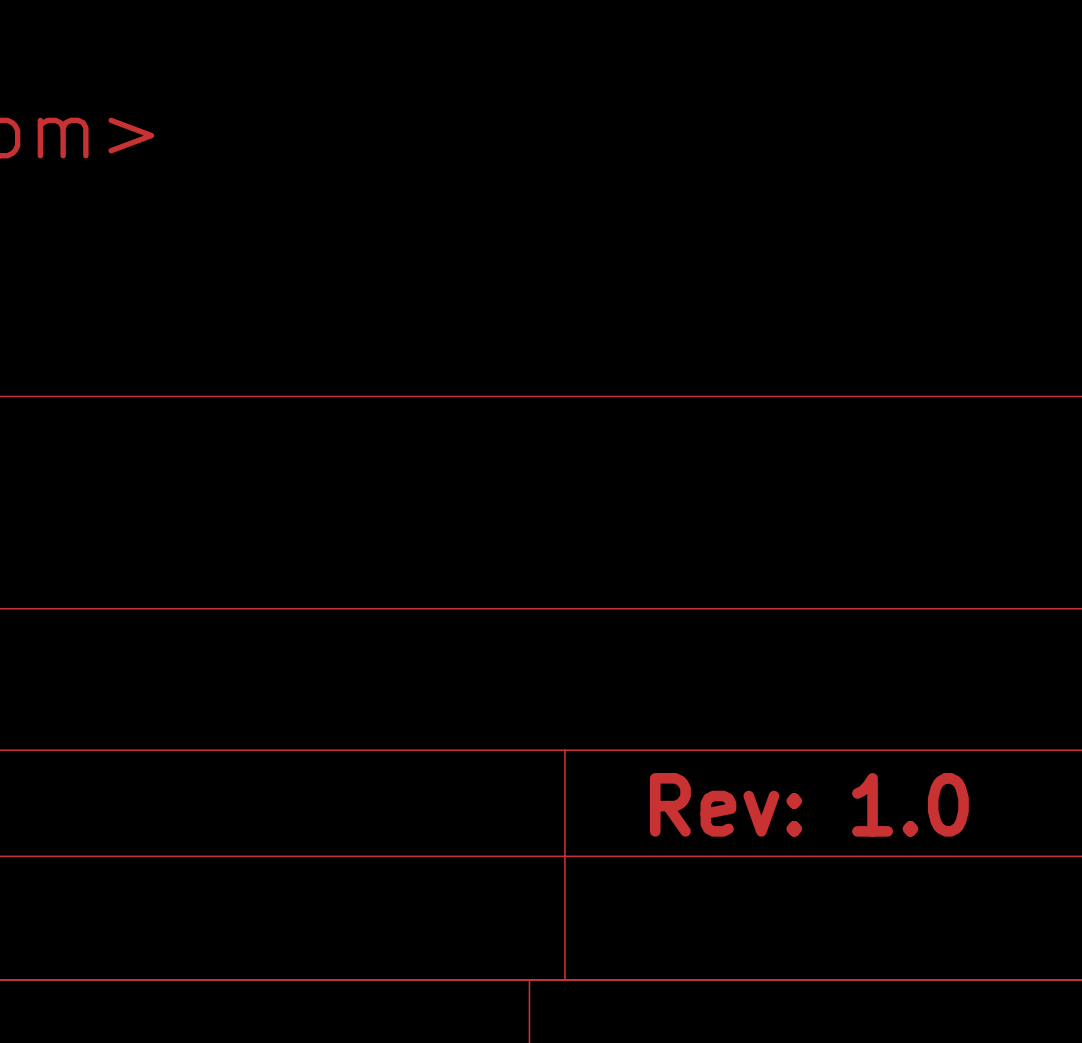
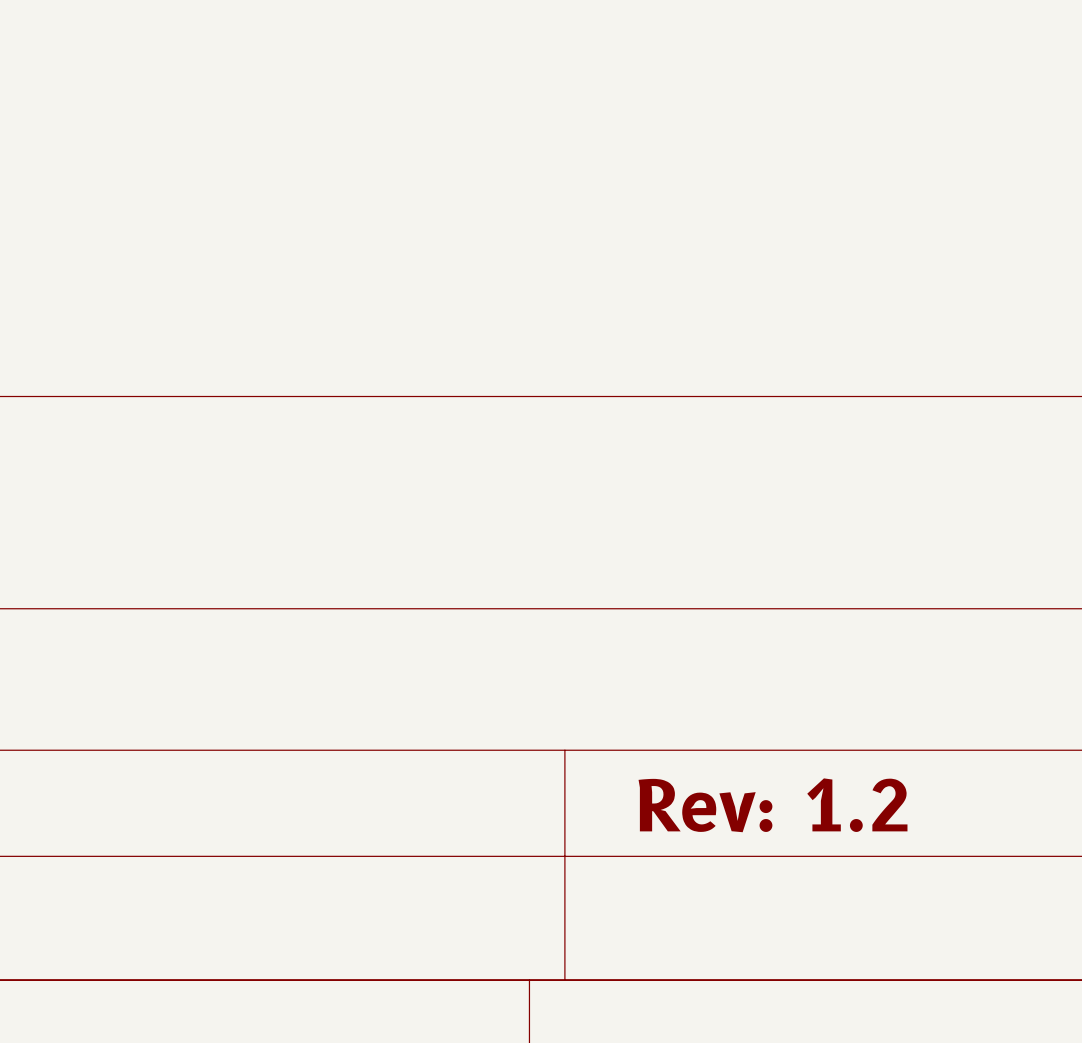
title block: Rev: 1.0 (809, 804) -> Rev: 1.2 (773, 805)

